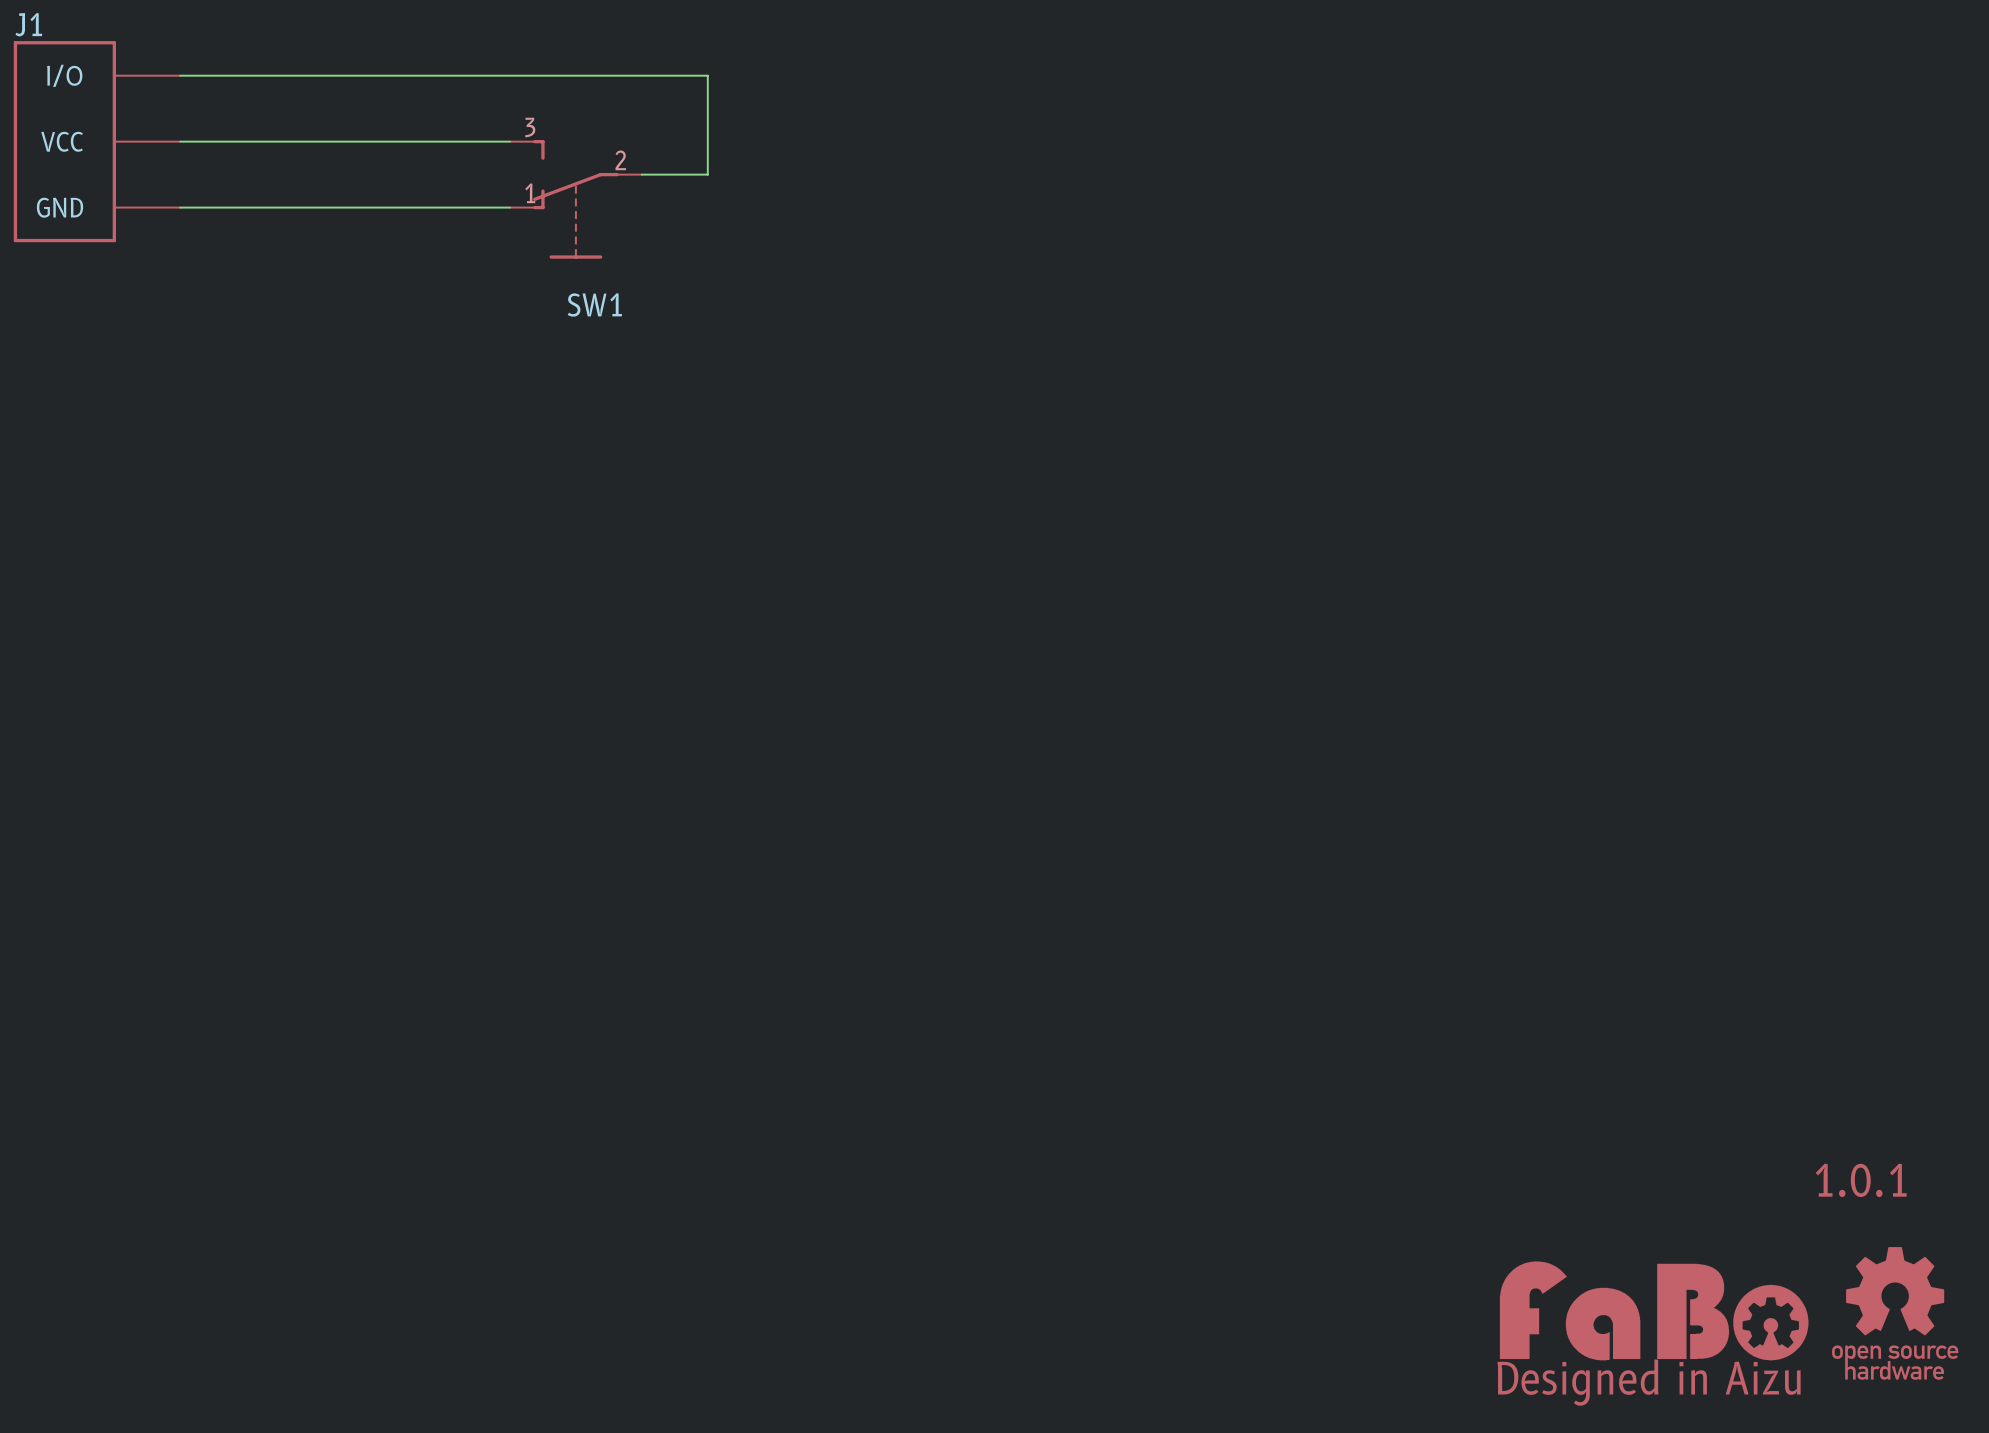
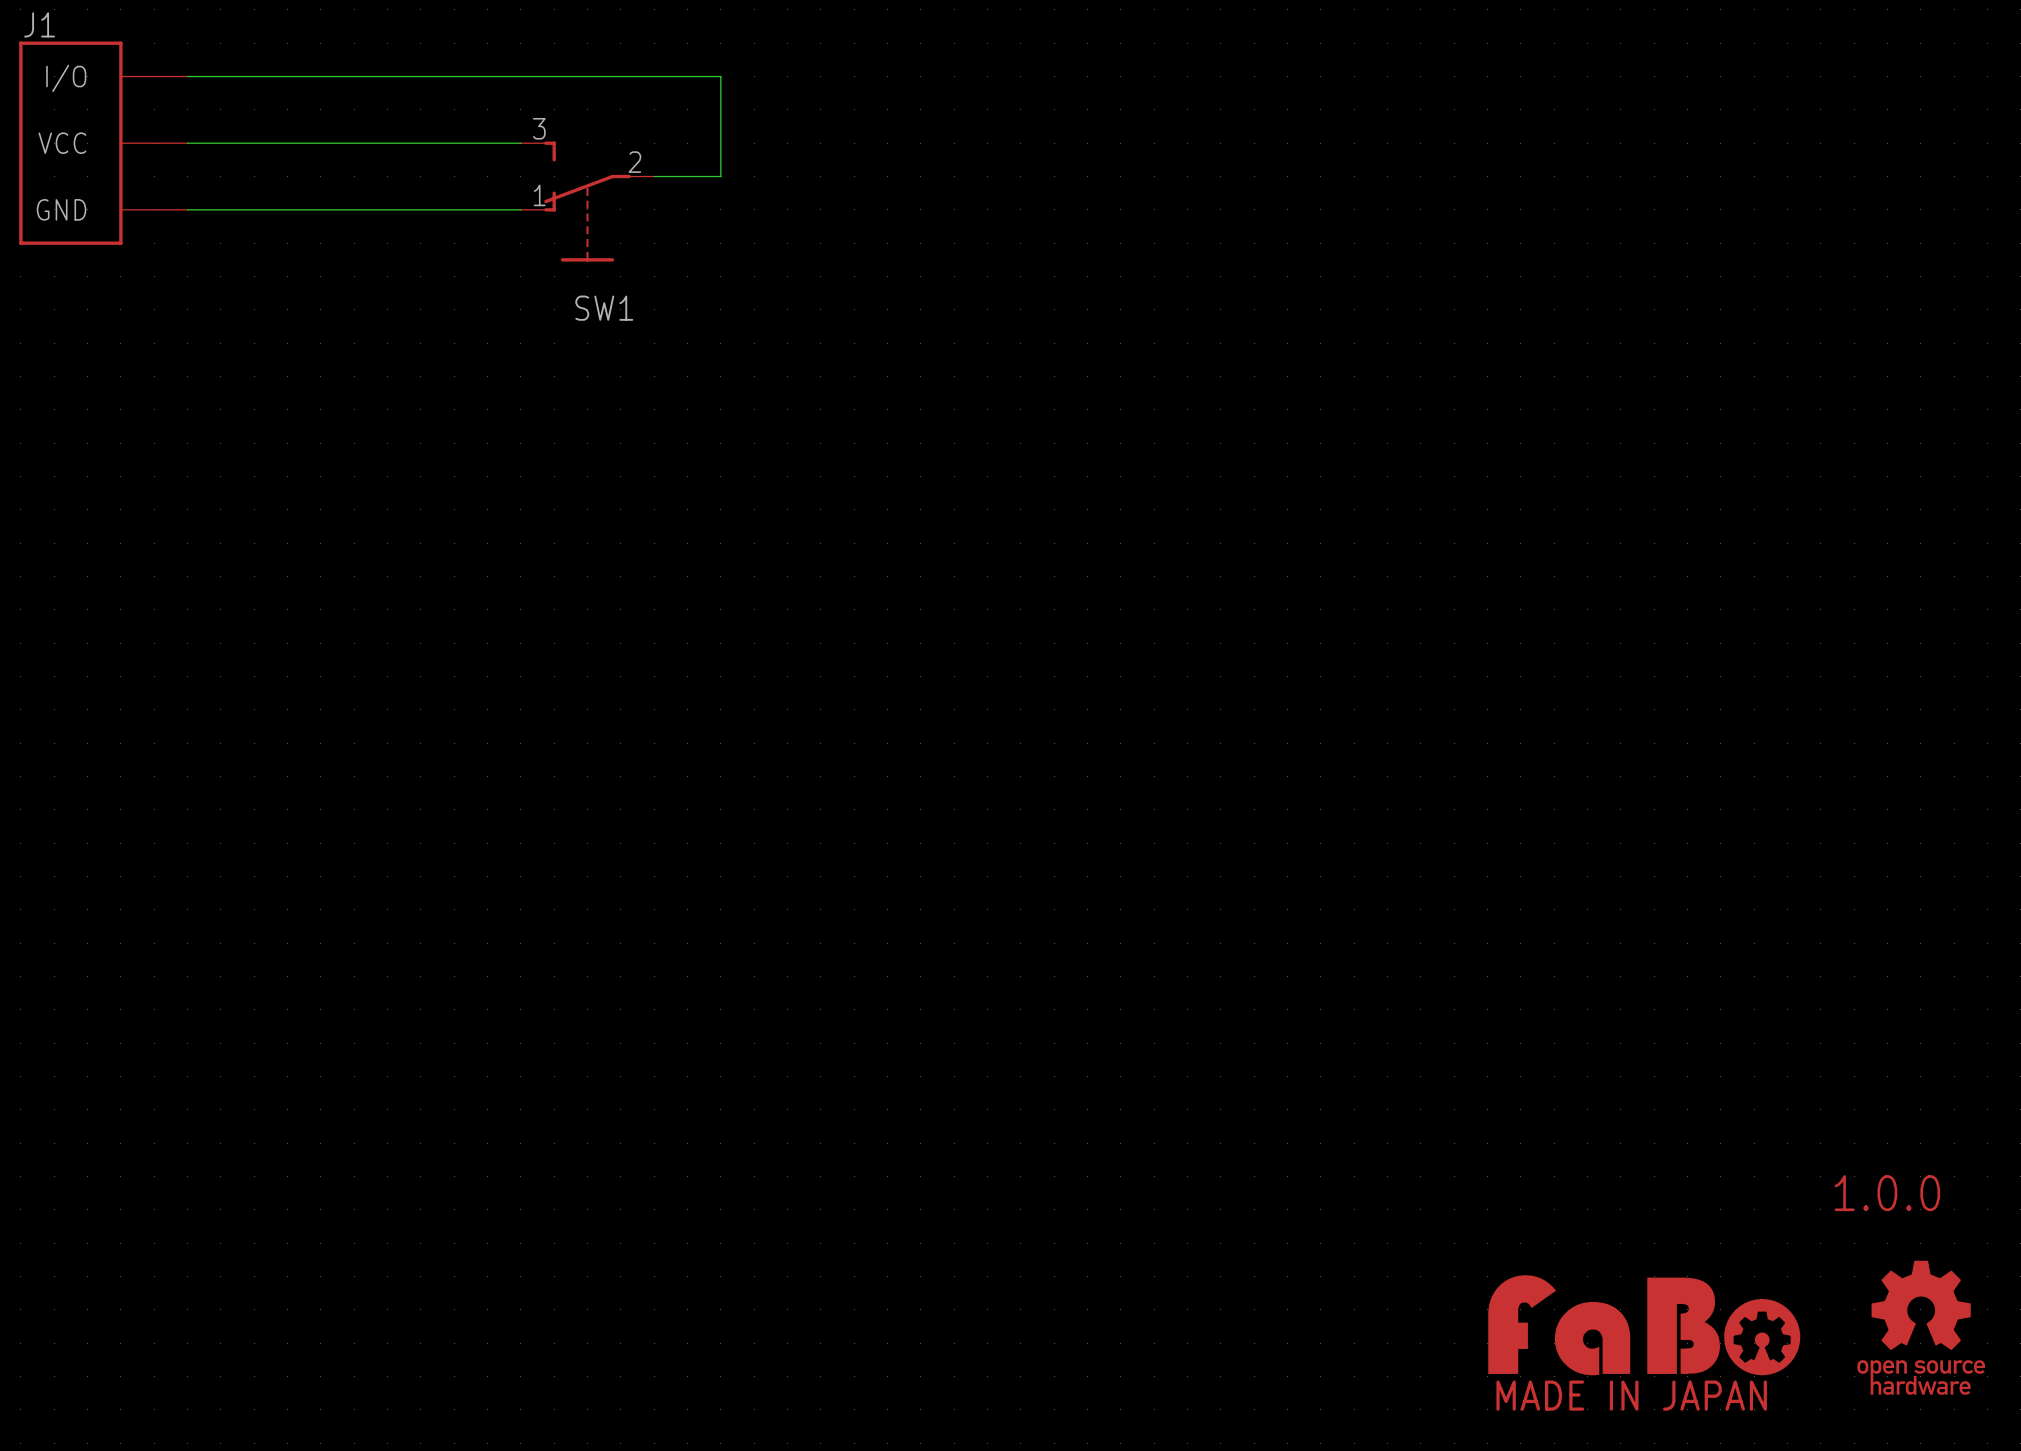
text: 1.0.1 (1861, 1180) -> 1.0.0 (1887, 1193)
part: none -> (1644, 1325)
part: (1654, 1310) -> none

